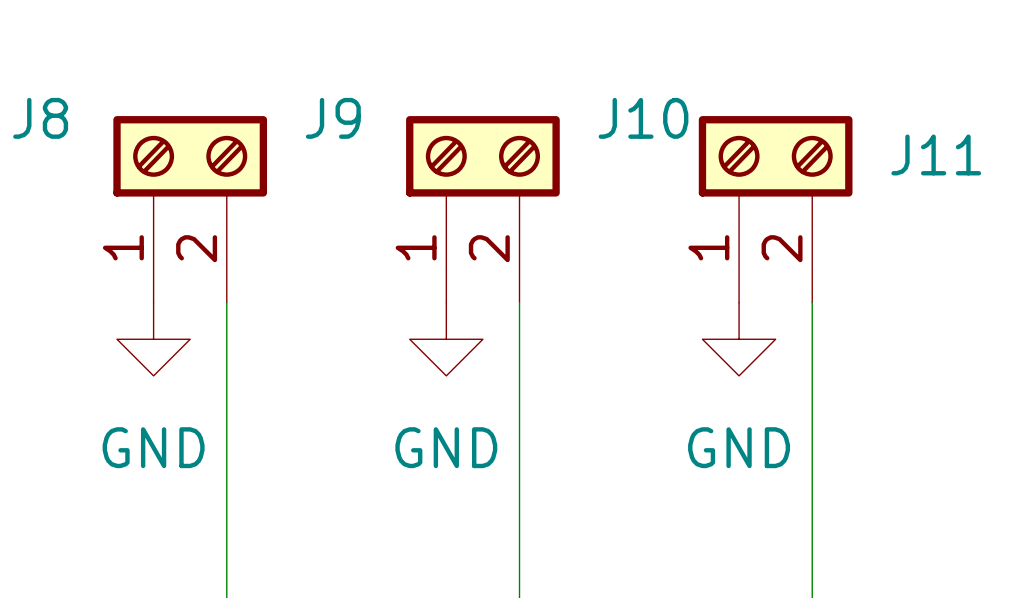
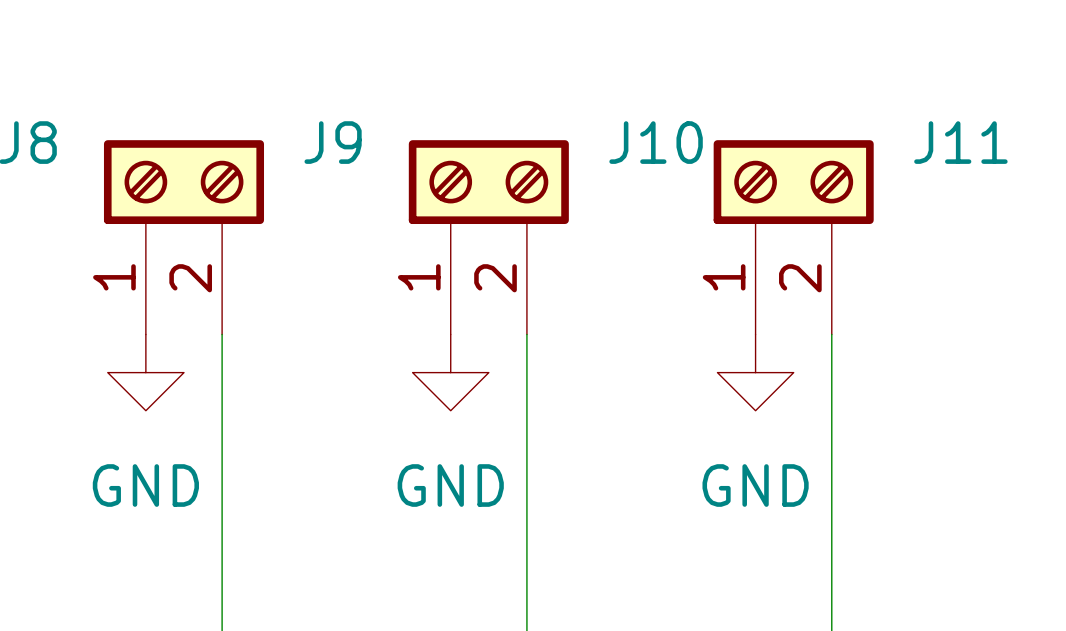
J11 name position: J11 (936, 154) -> J11 (960, 142)

